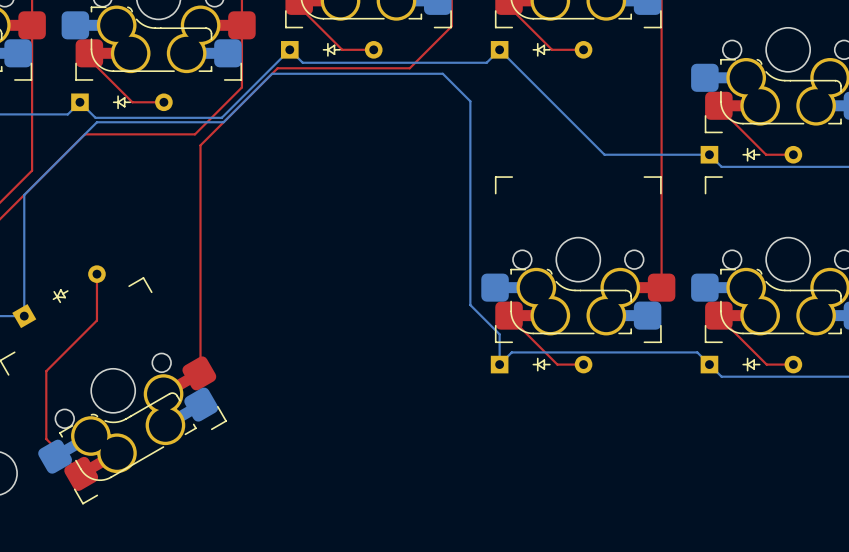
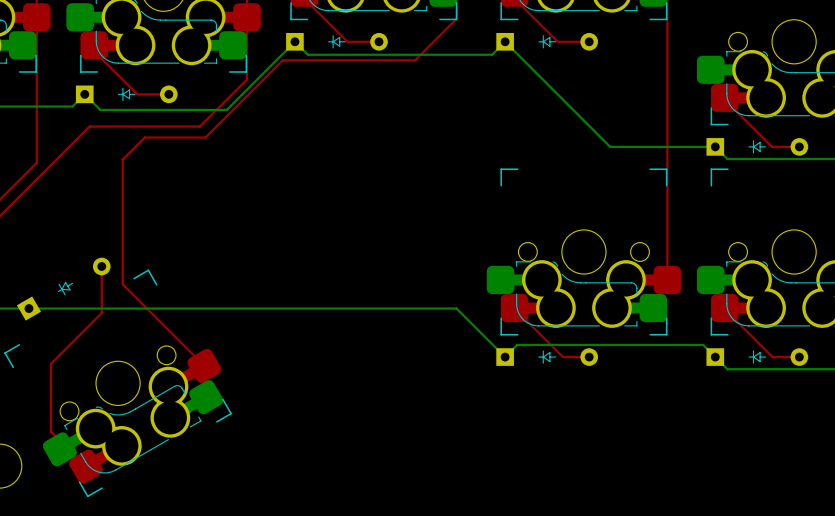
top track: (200, 145) (199, 373) -> (205, 137) (144, 137) (122, 159) (122, 284) (204, 365)
bottom track: (24, 316) (24, 194) (96, 122) (223, 122) (272, 73) (442, 73) (470, 101) (470, 305) (499, 334) (499, 364) -> (28, 308) (456, 308) (505, 357)

